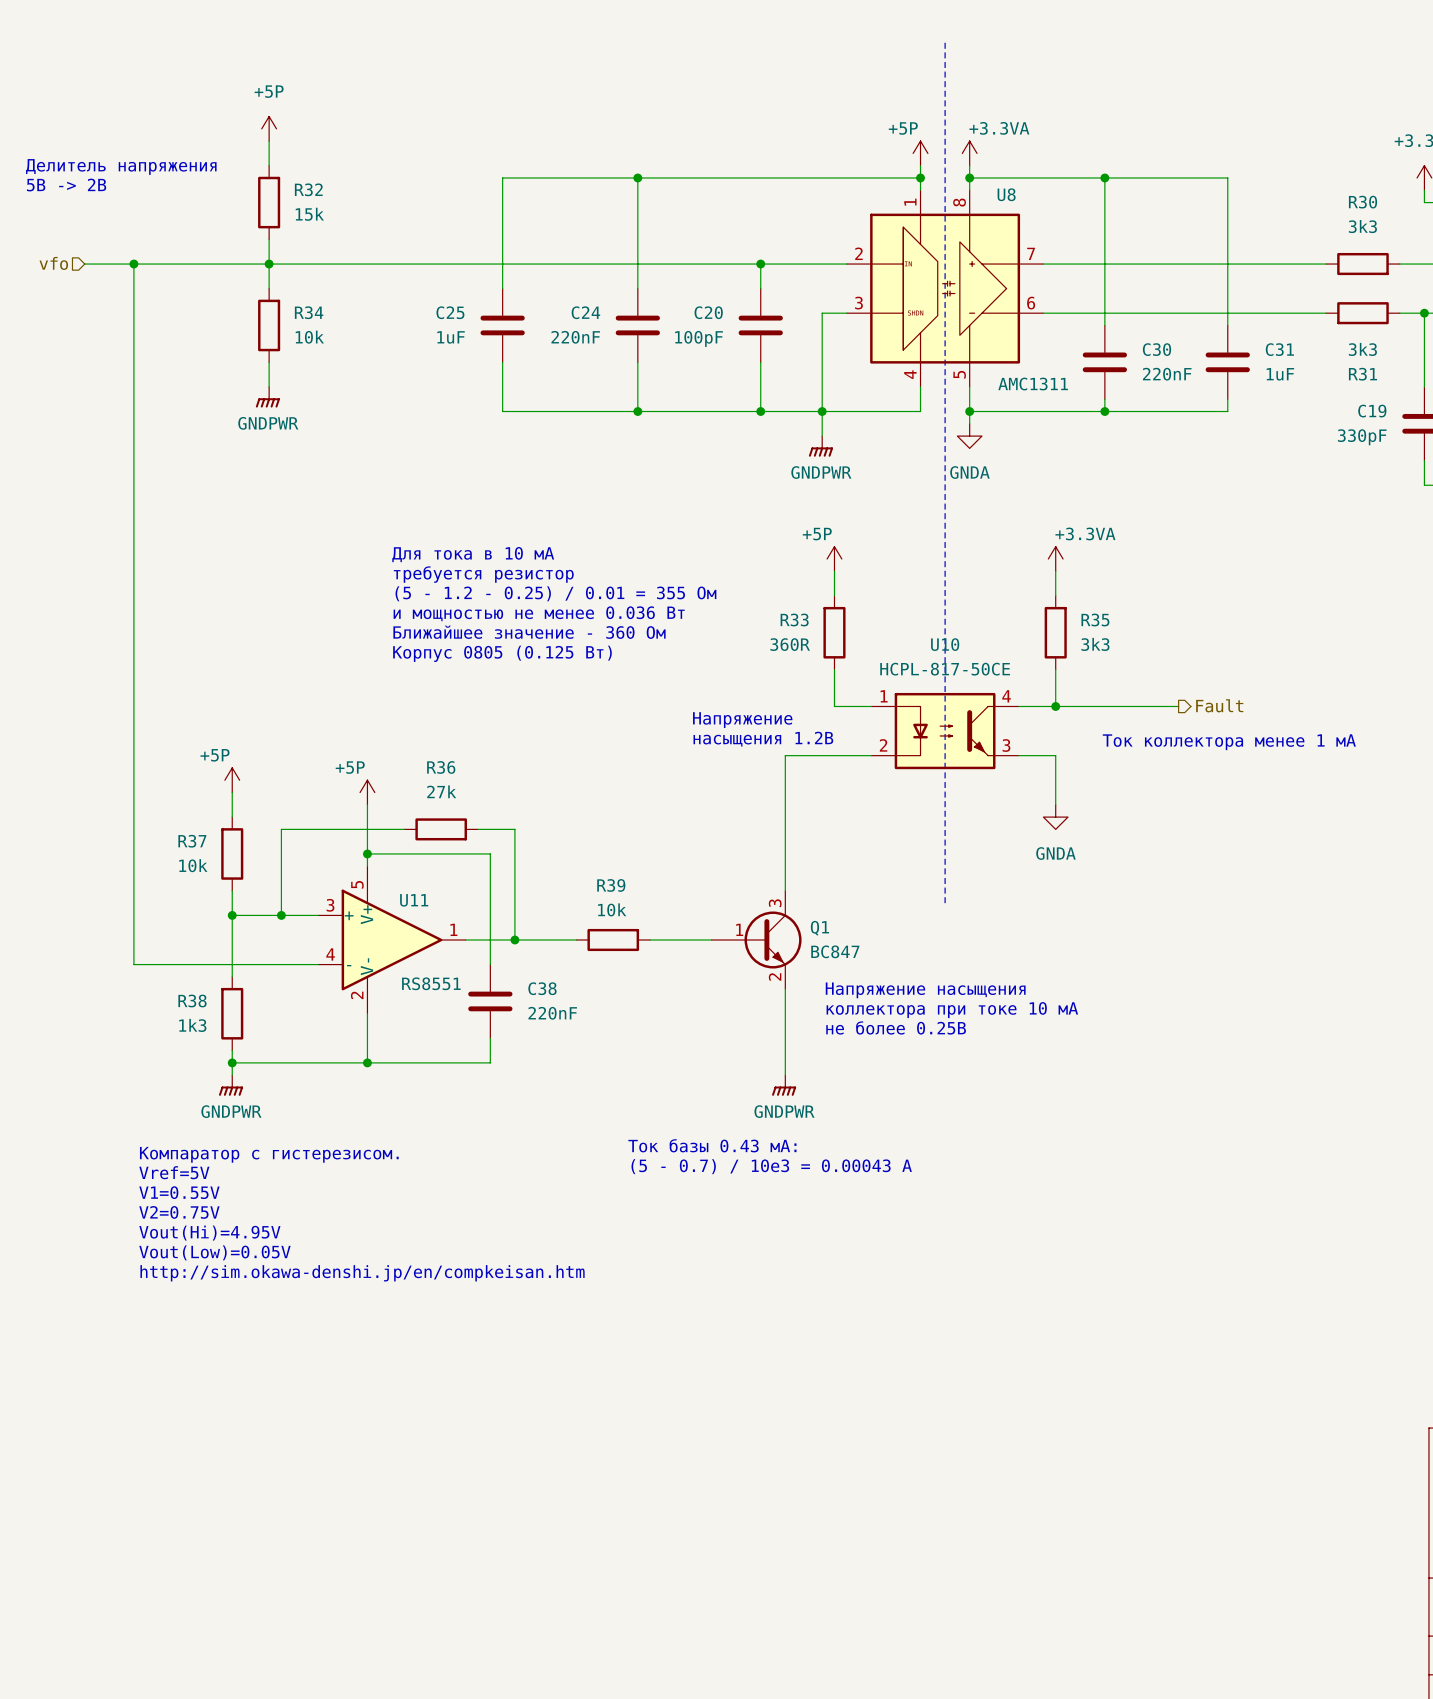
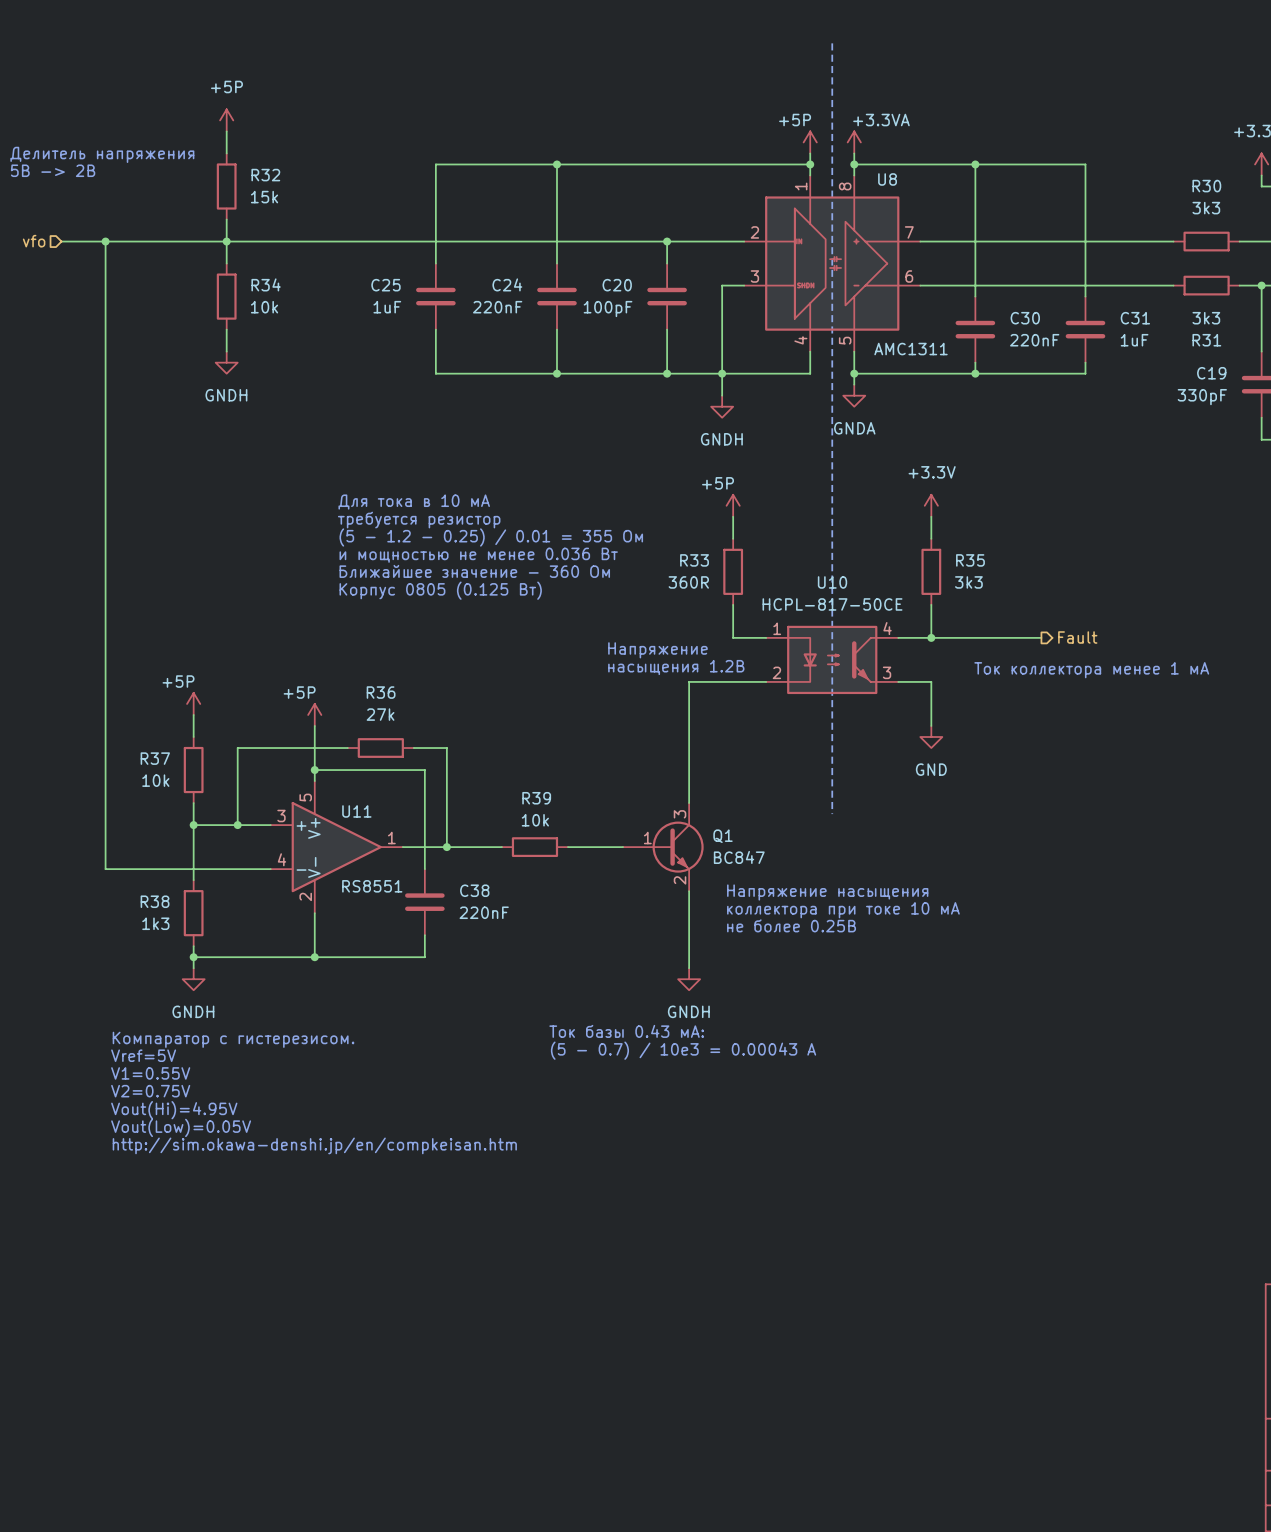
power symbol: GNDPWR (267, 397) -> GNDH (226, 362)
power symbol: GNDPWR (820, 446) -> GNDH (722, 406)
power symbol: +3.3VA (1055, 558) -> +3.3V (931, 505)
power symbol: GNDA (1055, 817) -> GND (931, 737)
power symbol: GNDPWR (231, 1085) -> GNDH (193, 979)
power symbol: GNDPWR (784, 1085) -> GNDH (689, 979)

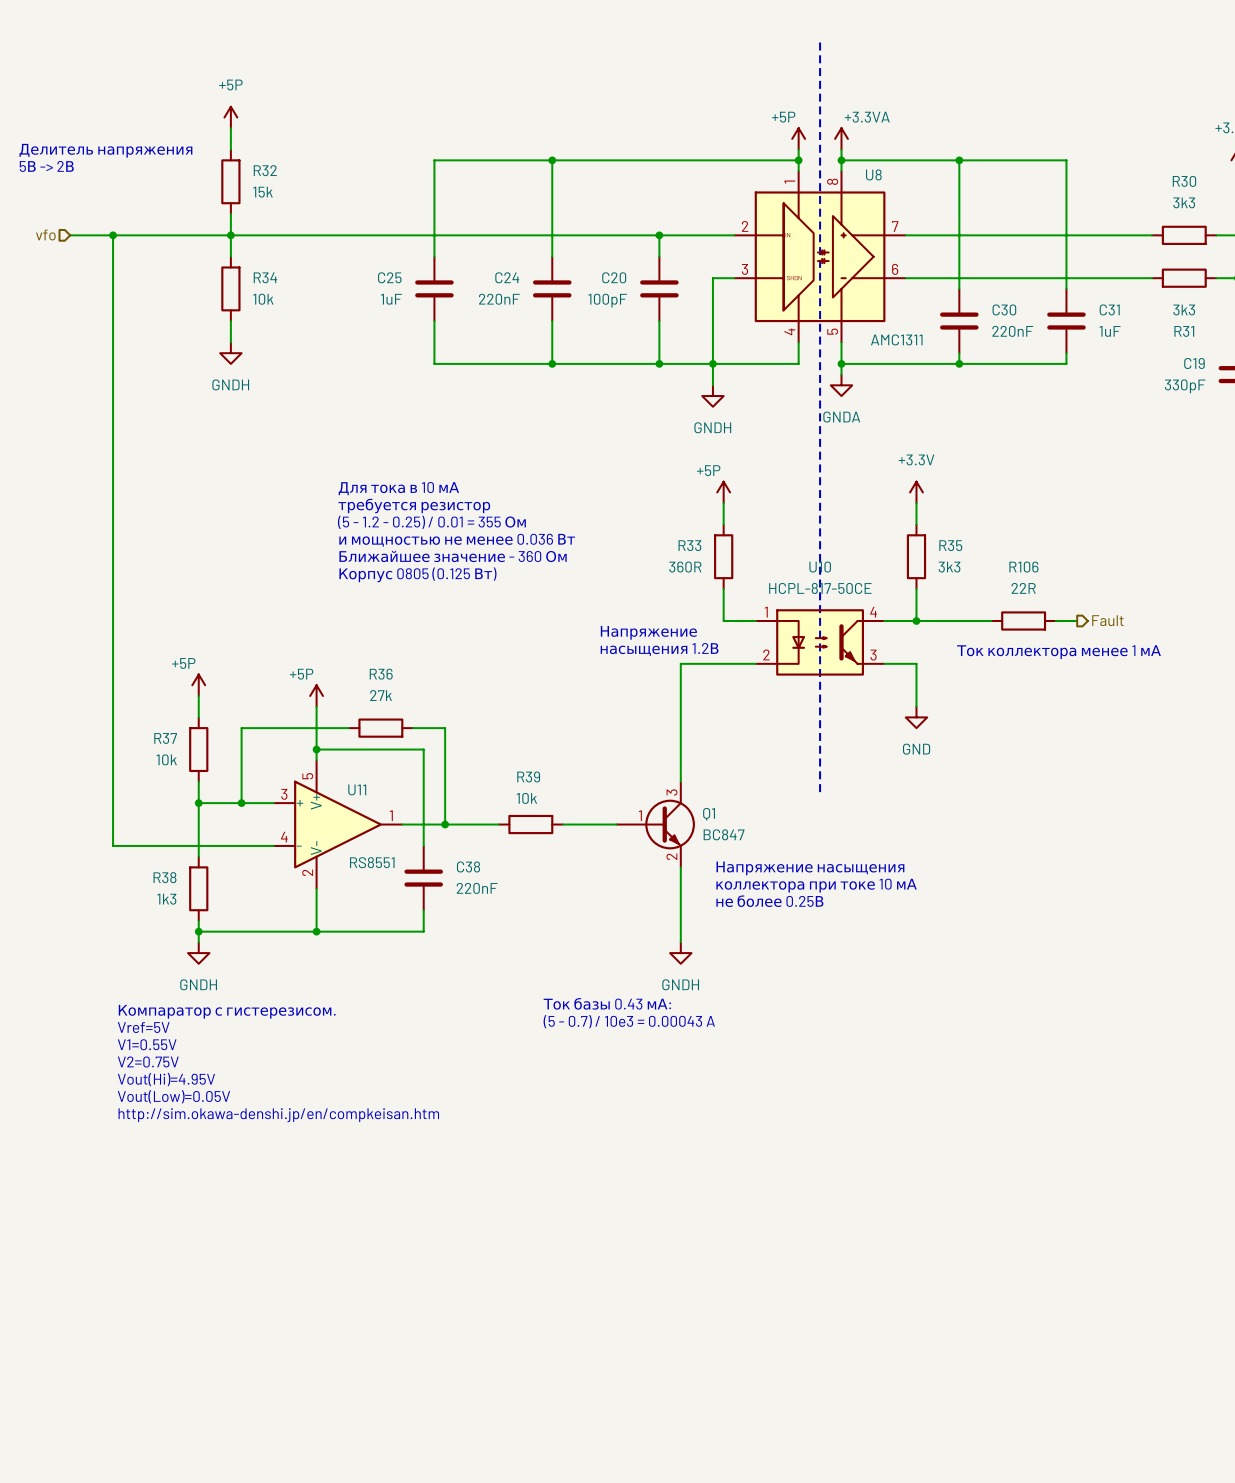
wire: (1008, 637) (1041, 637) -> none
R106: none -> 22R (1023, 620)
wire: none -> (1055, 620) (1077, 620)
hierarchical label position: Fault (1077, 637) -> Fault (1107, 620)

